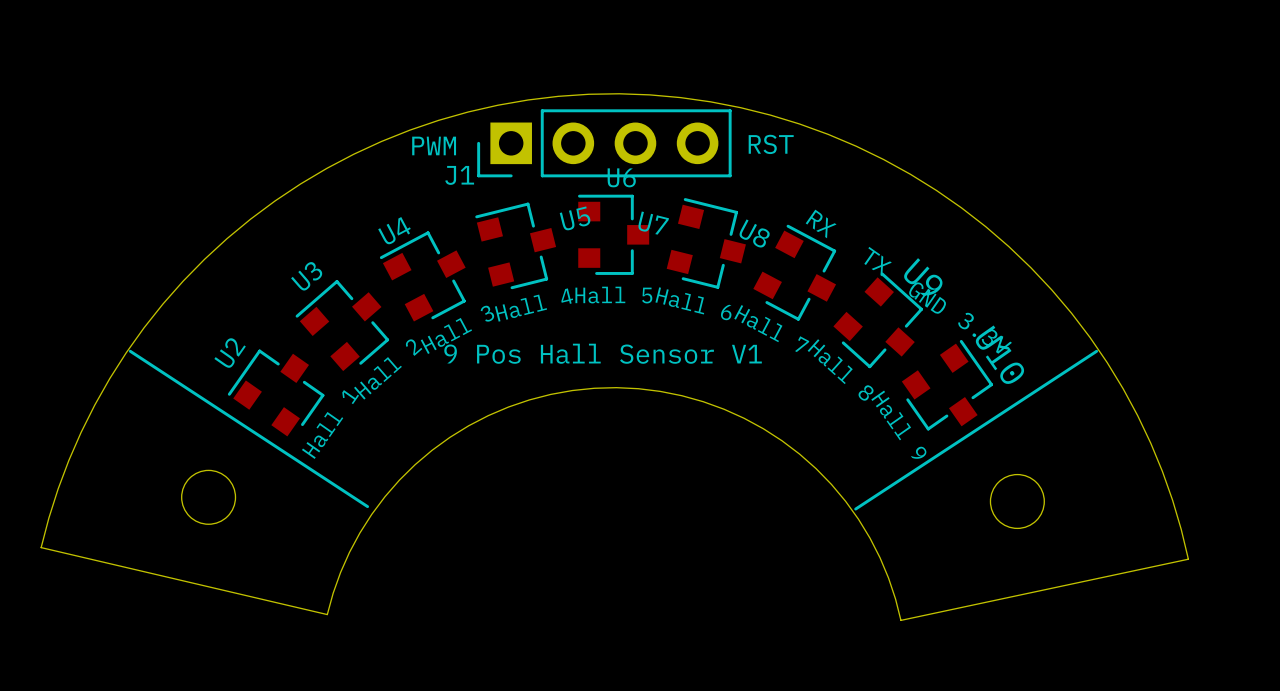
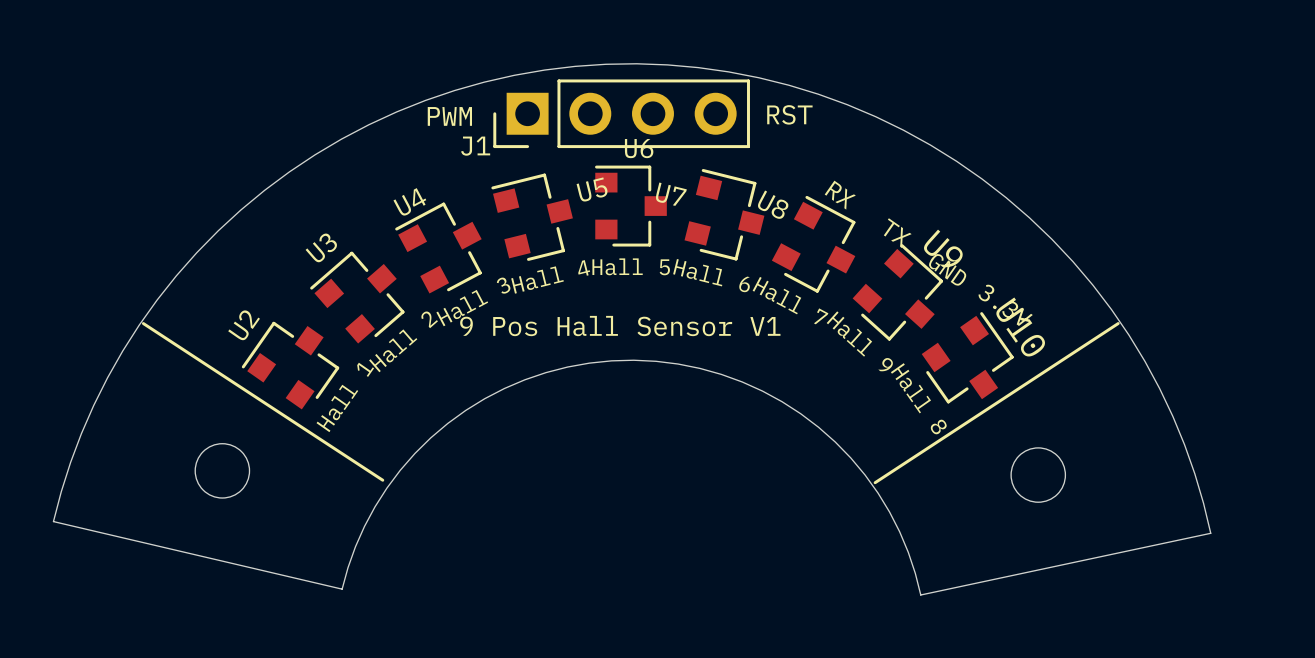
U9 value: Hall 8 (840, 369) -> Hall 9 (859, 341)
U10 value: Hall 9 (898, 424) -> Hall 8 (918, 398)

